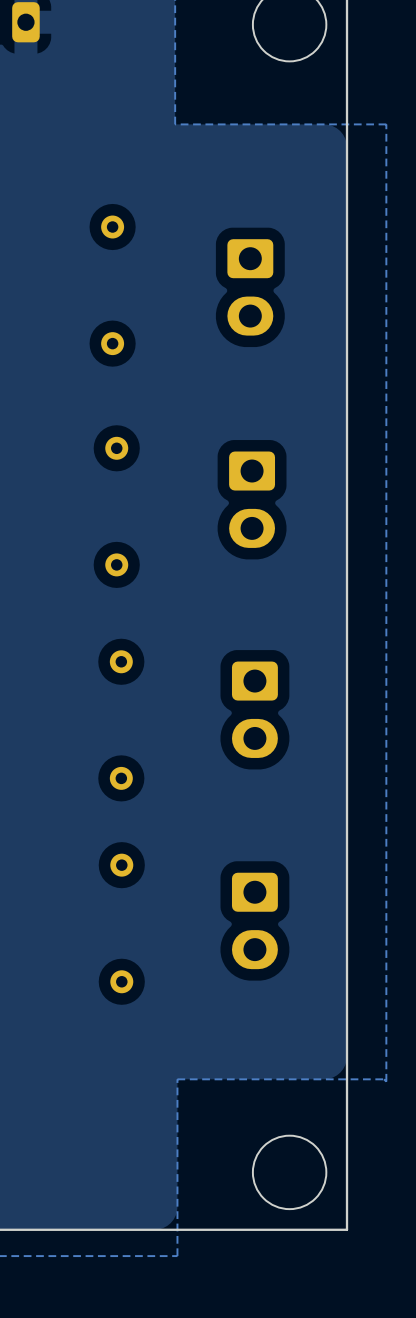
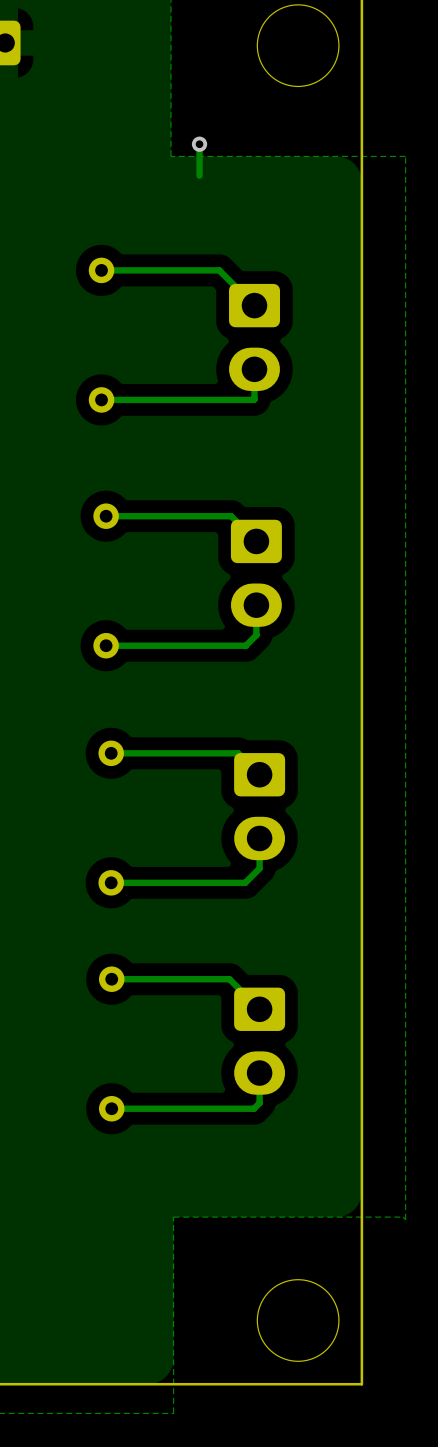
track: none -> (199, 144) (199, 175)
via: none -> (199, 144)
track: none -> (101, 270) (219, 270) (254, 305)
track: none -> (254, 369) (253, 399) (101, 399)
track: none -> (106, 516) (231, 516) (256, 541)
track: none -> (256, 605) (256, 635) (245, 645) (106, 645)
track: none -> (111, 753) (238, 753) (259, 774)
track: none -> (259, 838) (259, 868) (245, 882) (111, 882)
track: none -> (111, 979) (229, 979) (259, 1009)
track: none -> (259, 1073) (259, 1103) (253, 1108) (111, 1108)

